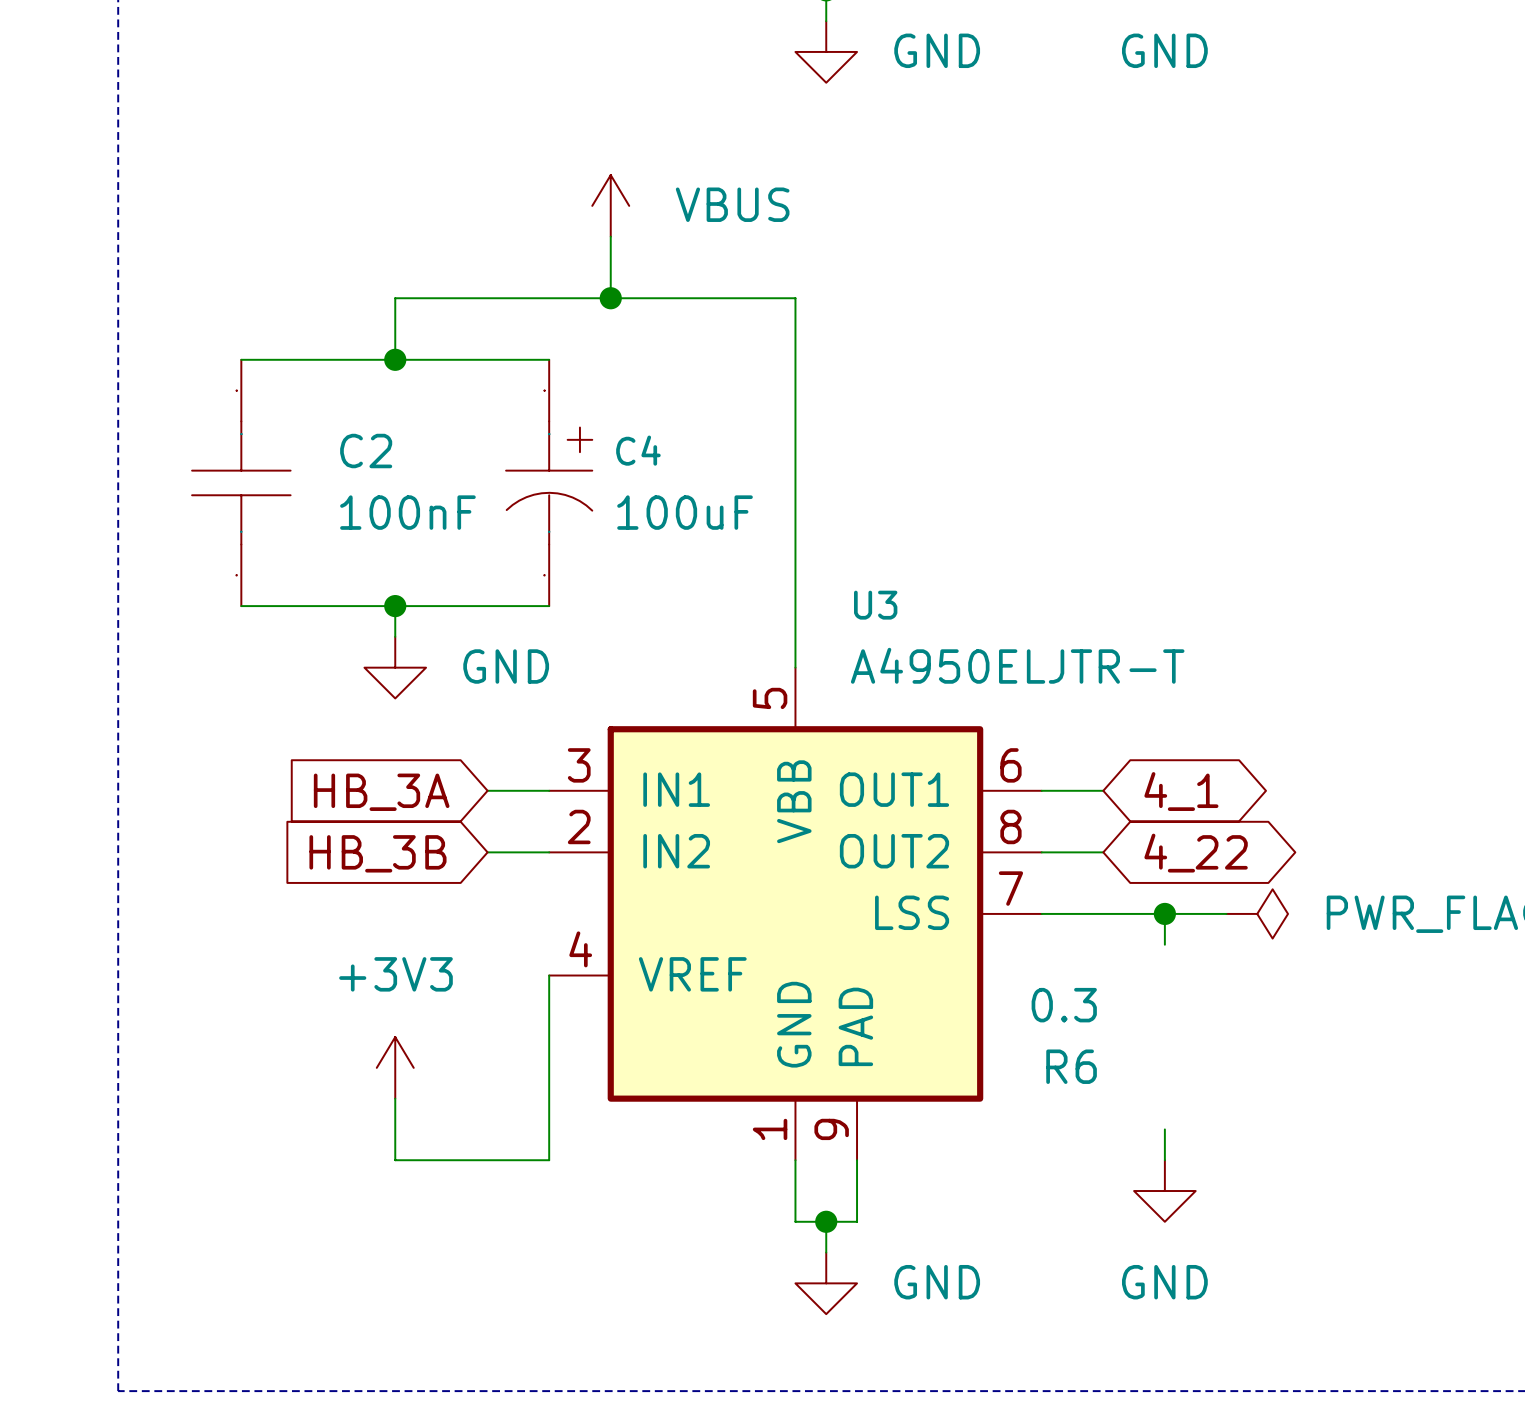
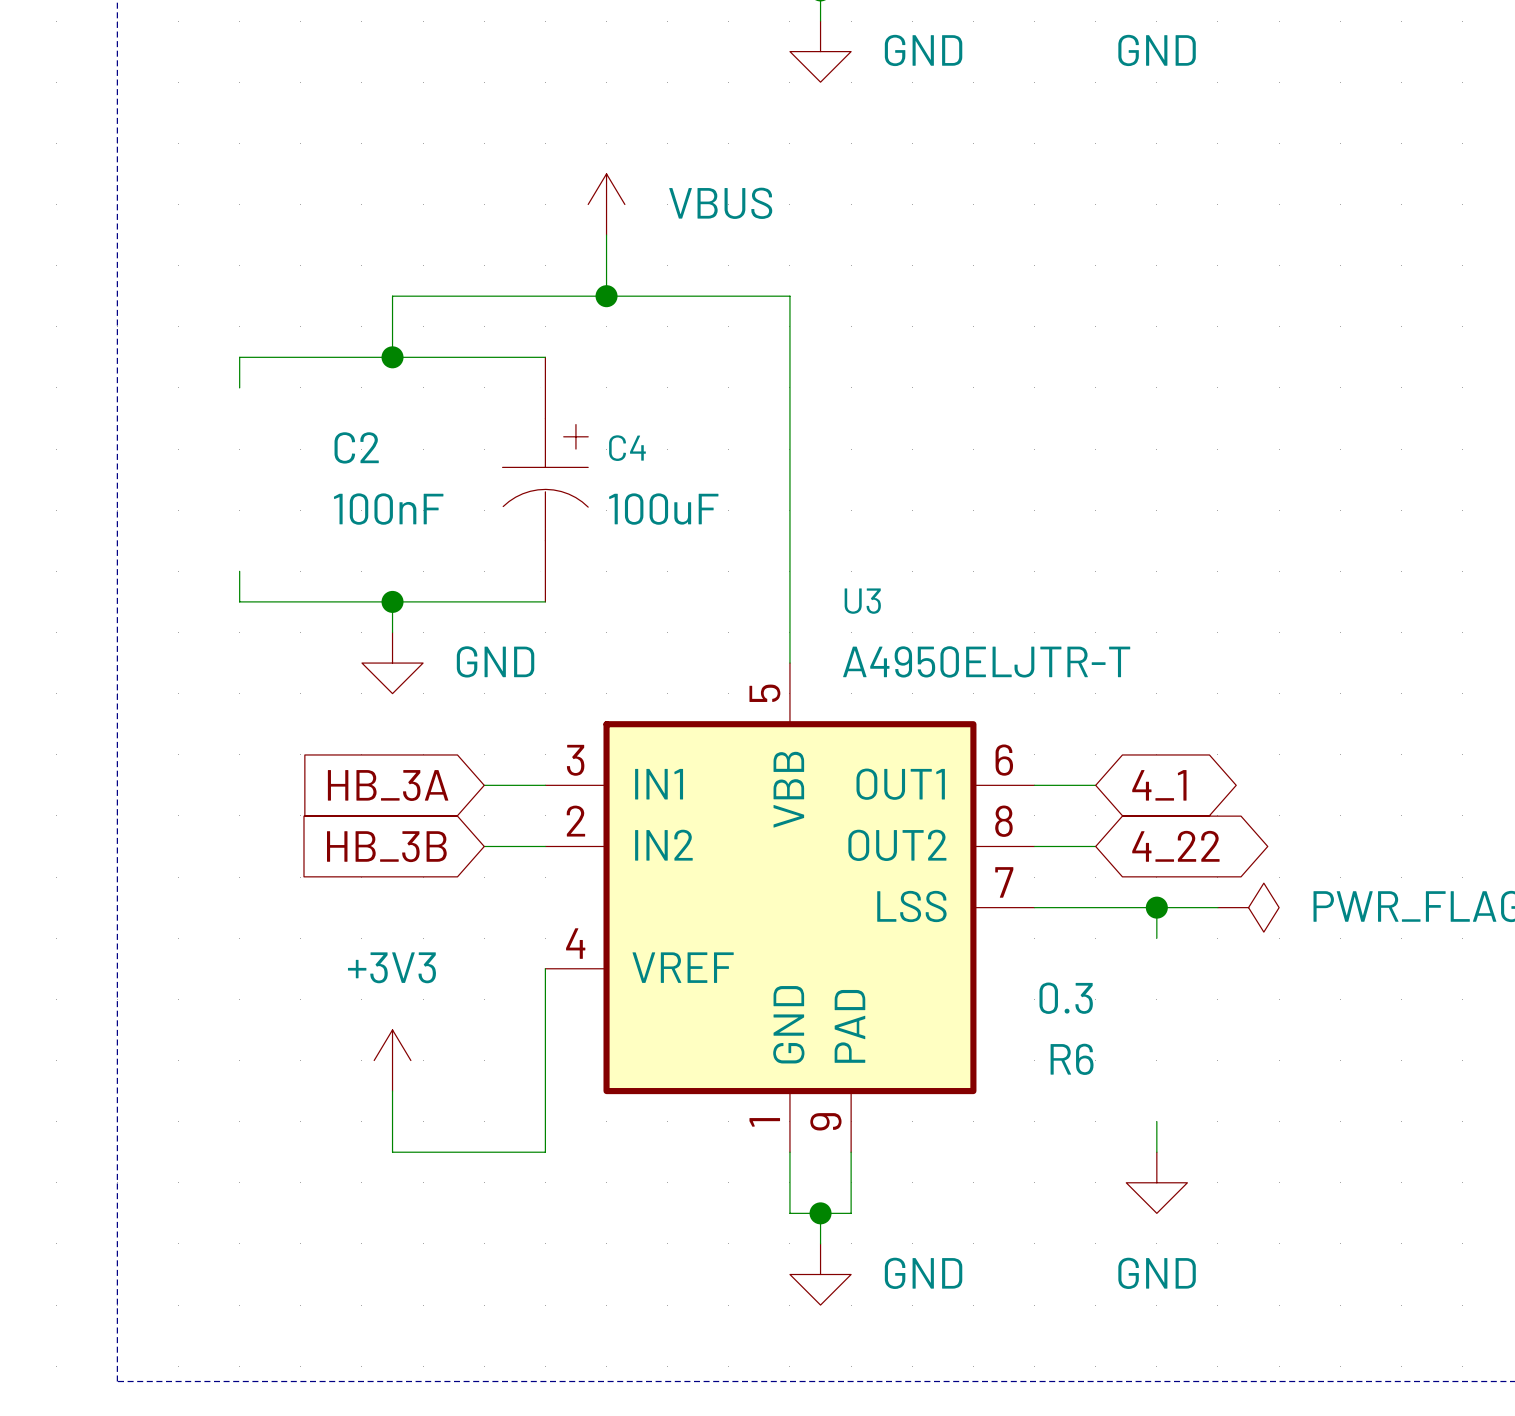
C2 symbol: [192, 359, 291, 607] -> [333, 432, 444, 525]

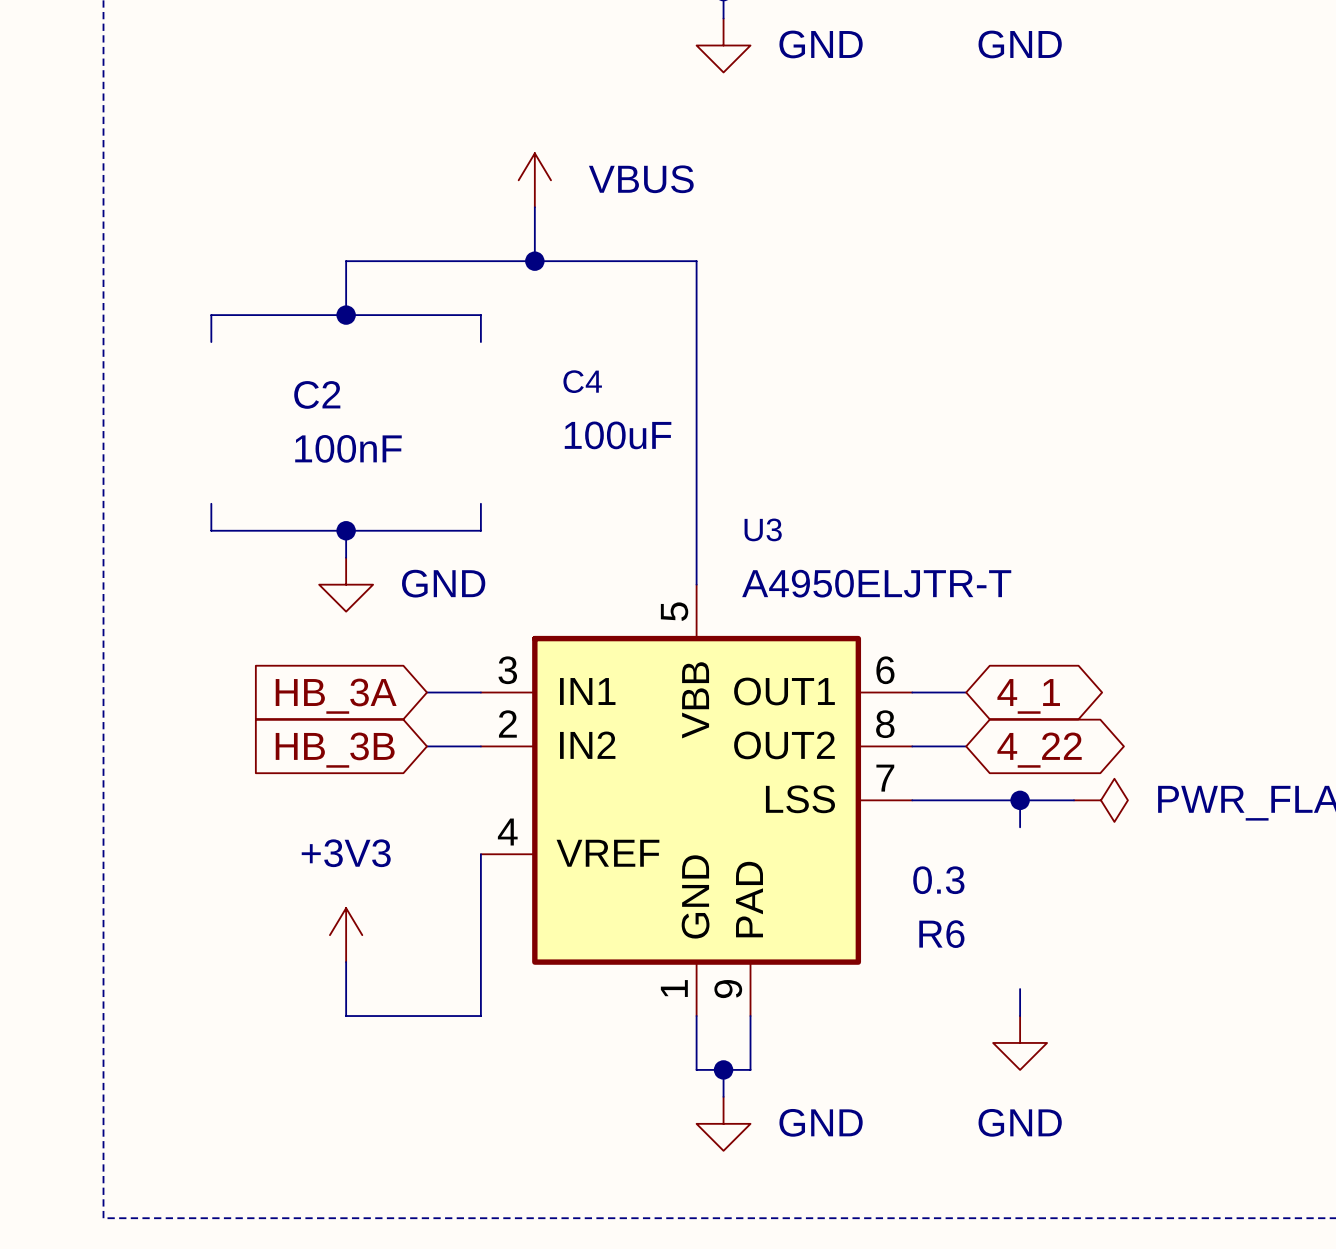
C4 symbol: [502, 357, 589, 602] -> [563, 370, 672, 450]
C4 name position: C4 (627, 448) -> C4 (582, 381)
C4 value position: 100uF (663, 509) -> 100uF (618, 435)

